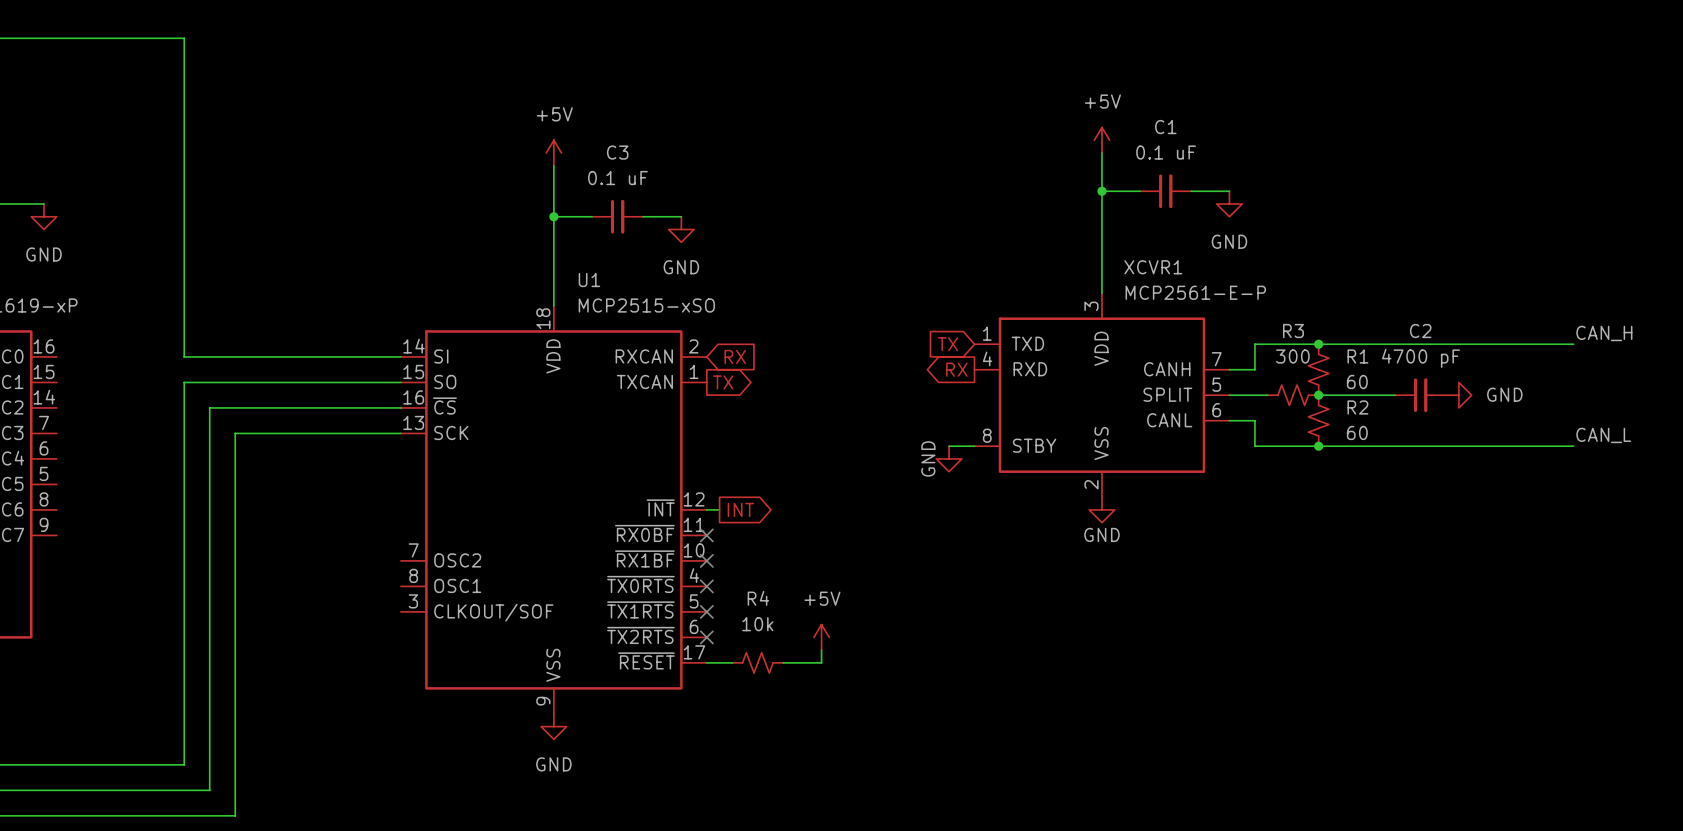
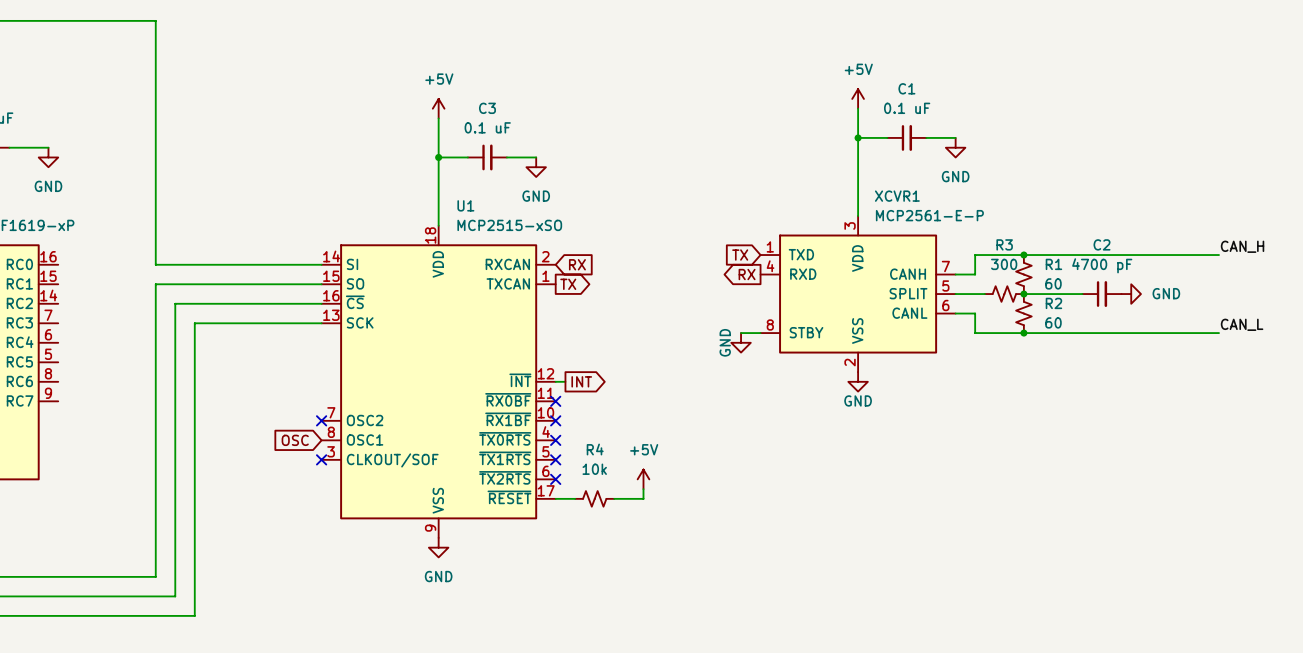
no-connect mark: none -> (321, 420)
global label: none -> OSC (295, 440)
no-connect mark: none -> (321, 459)

